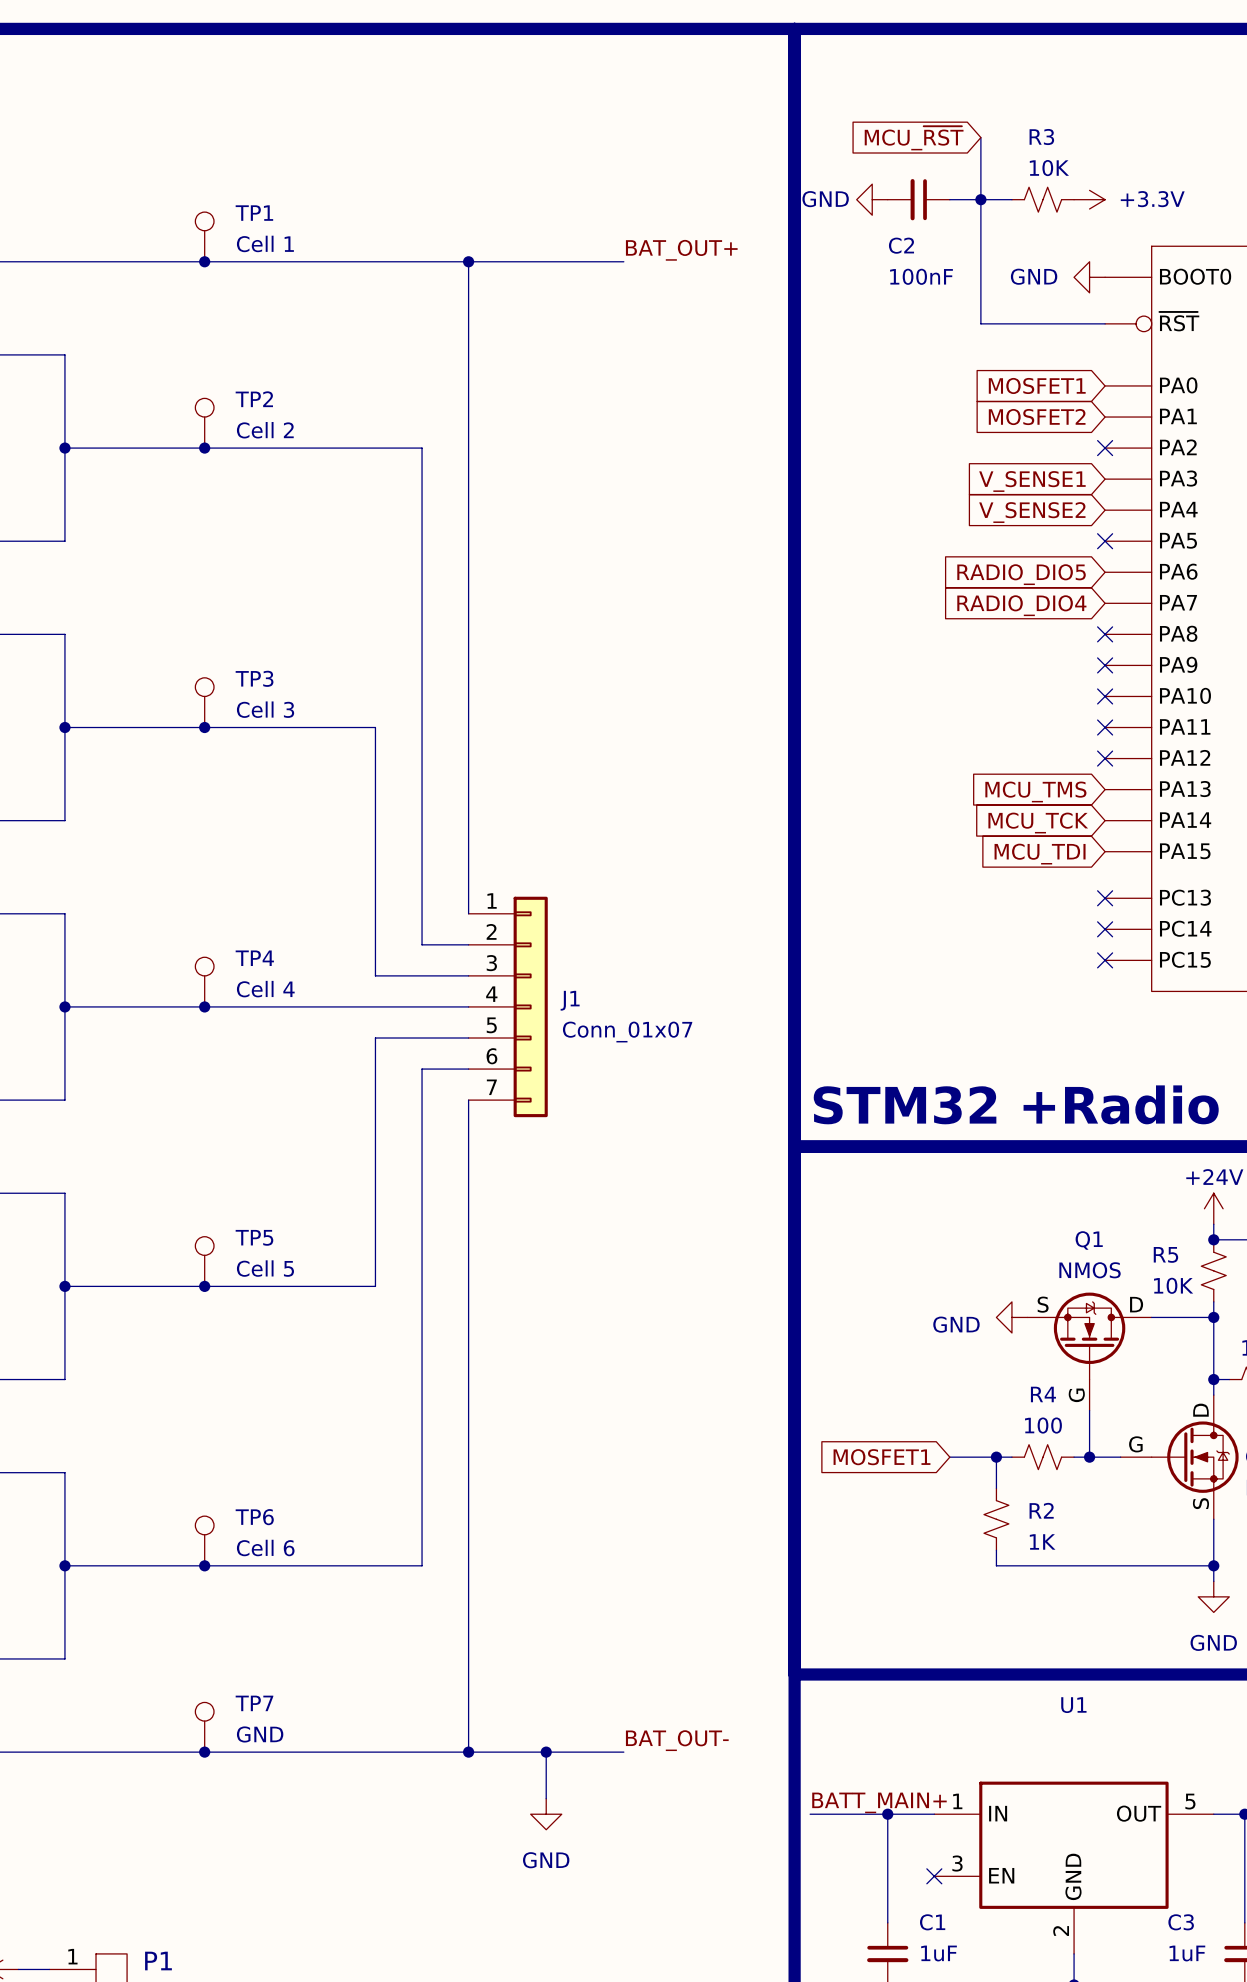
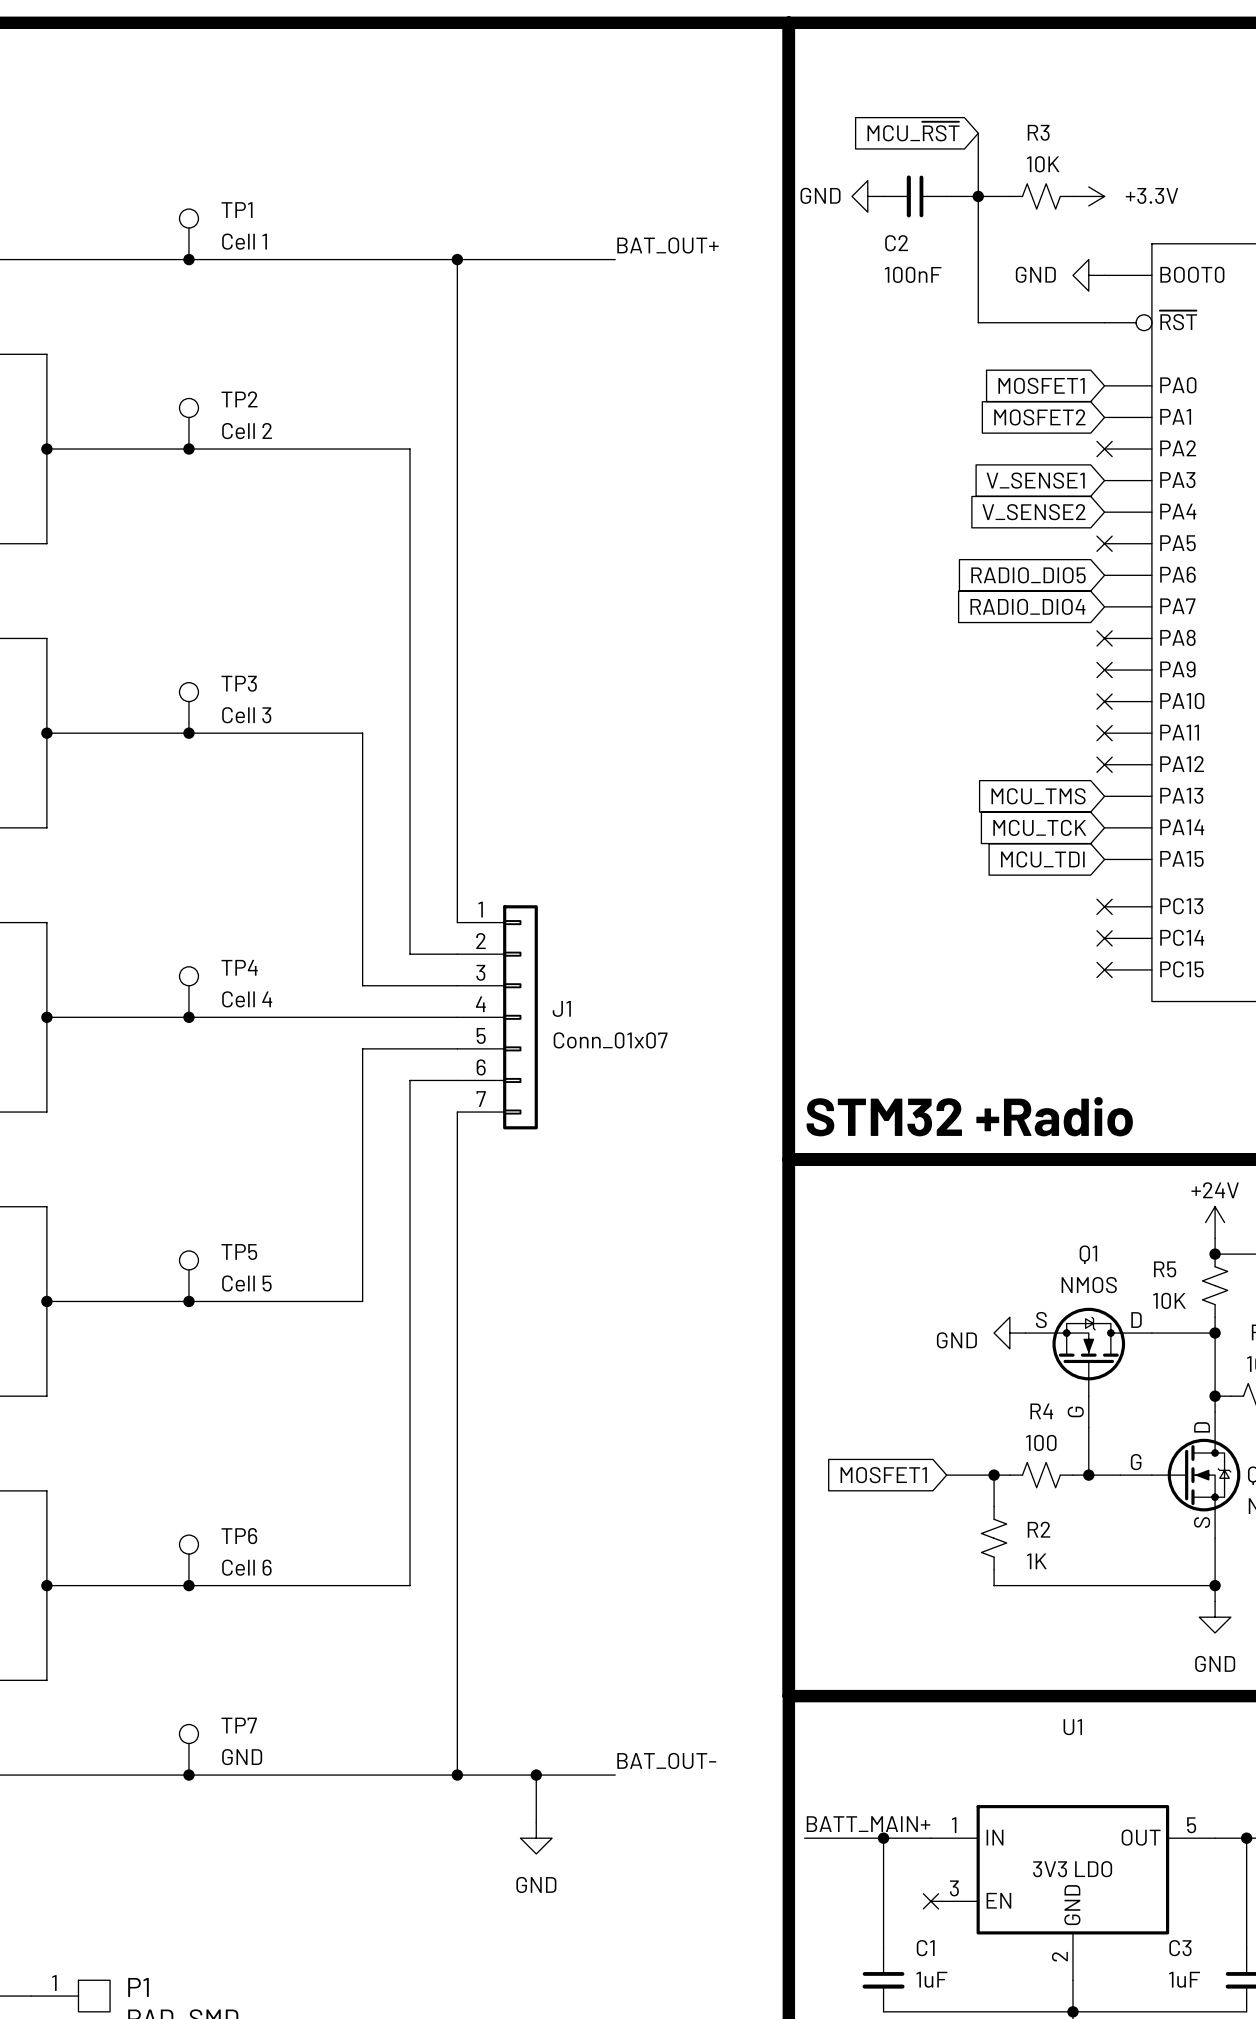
U1 value: none -> 3V3 LDO (1072, 1869)

